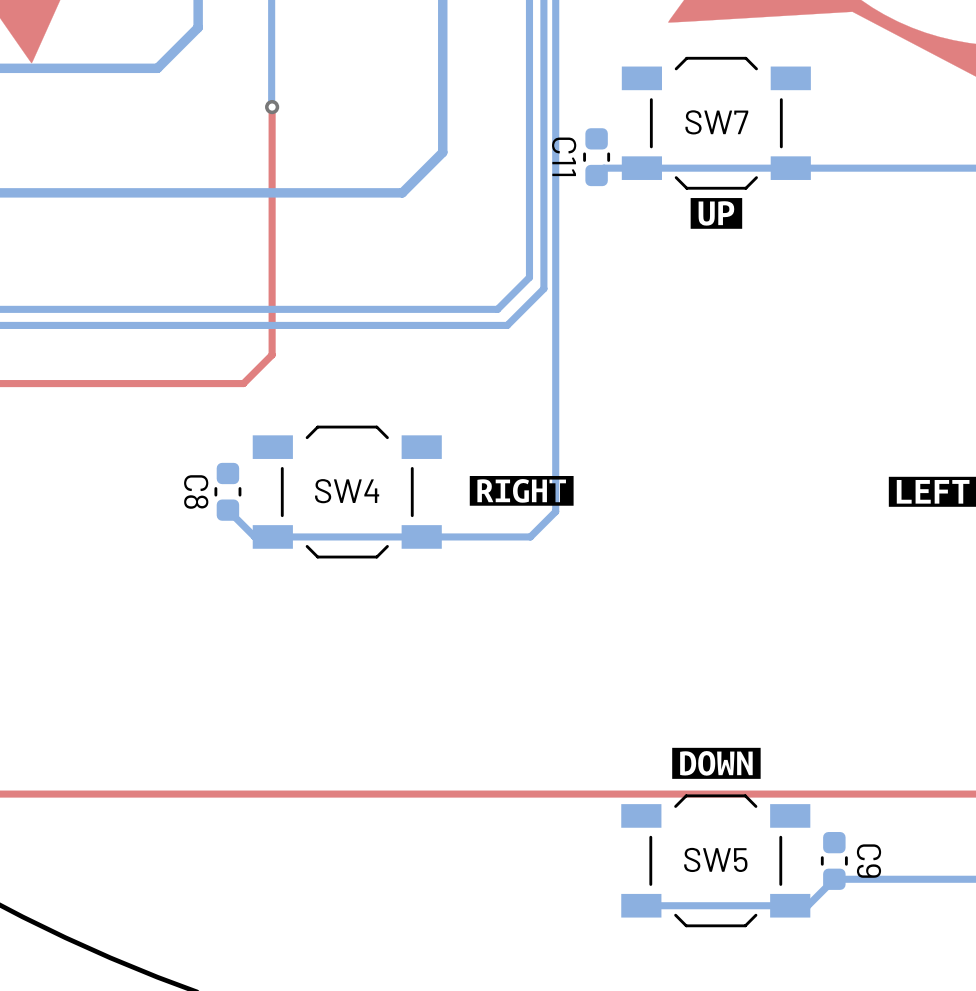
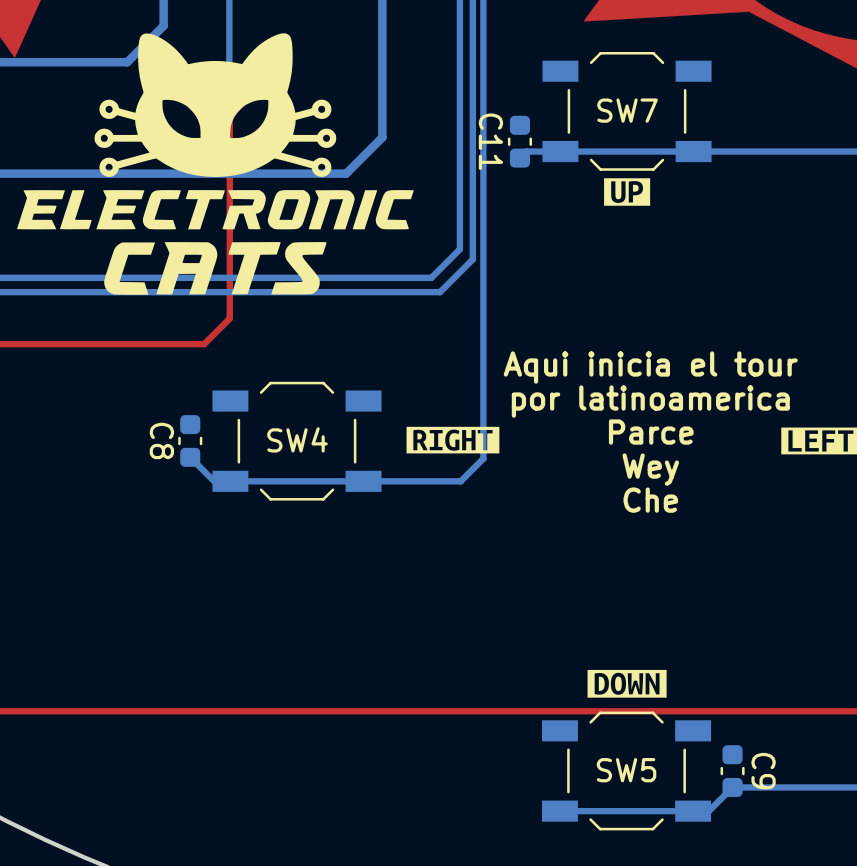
drawing: none -> [17, 33, 414, 295]
text: none -> Aqui inicia el tour (650, 367)
text: none -> por latinoamerica (650, 401)
text: none -> Parce (651, 432)
text: none -> Wey (650, 469)
text: none -> Che (650, 500)

